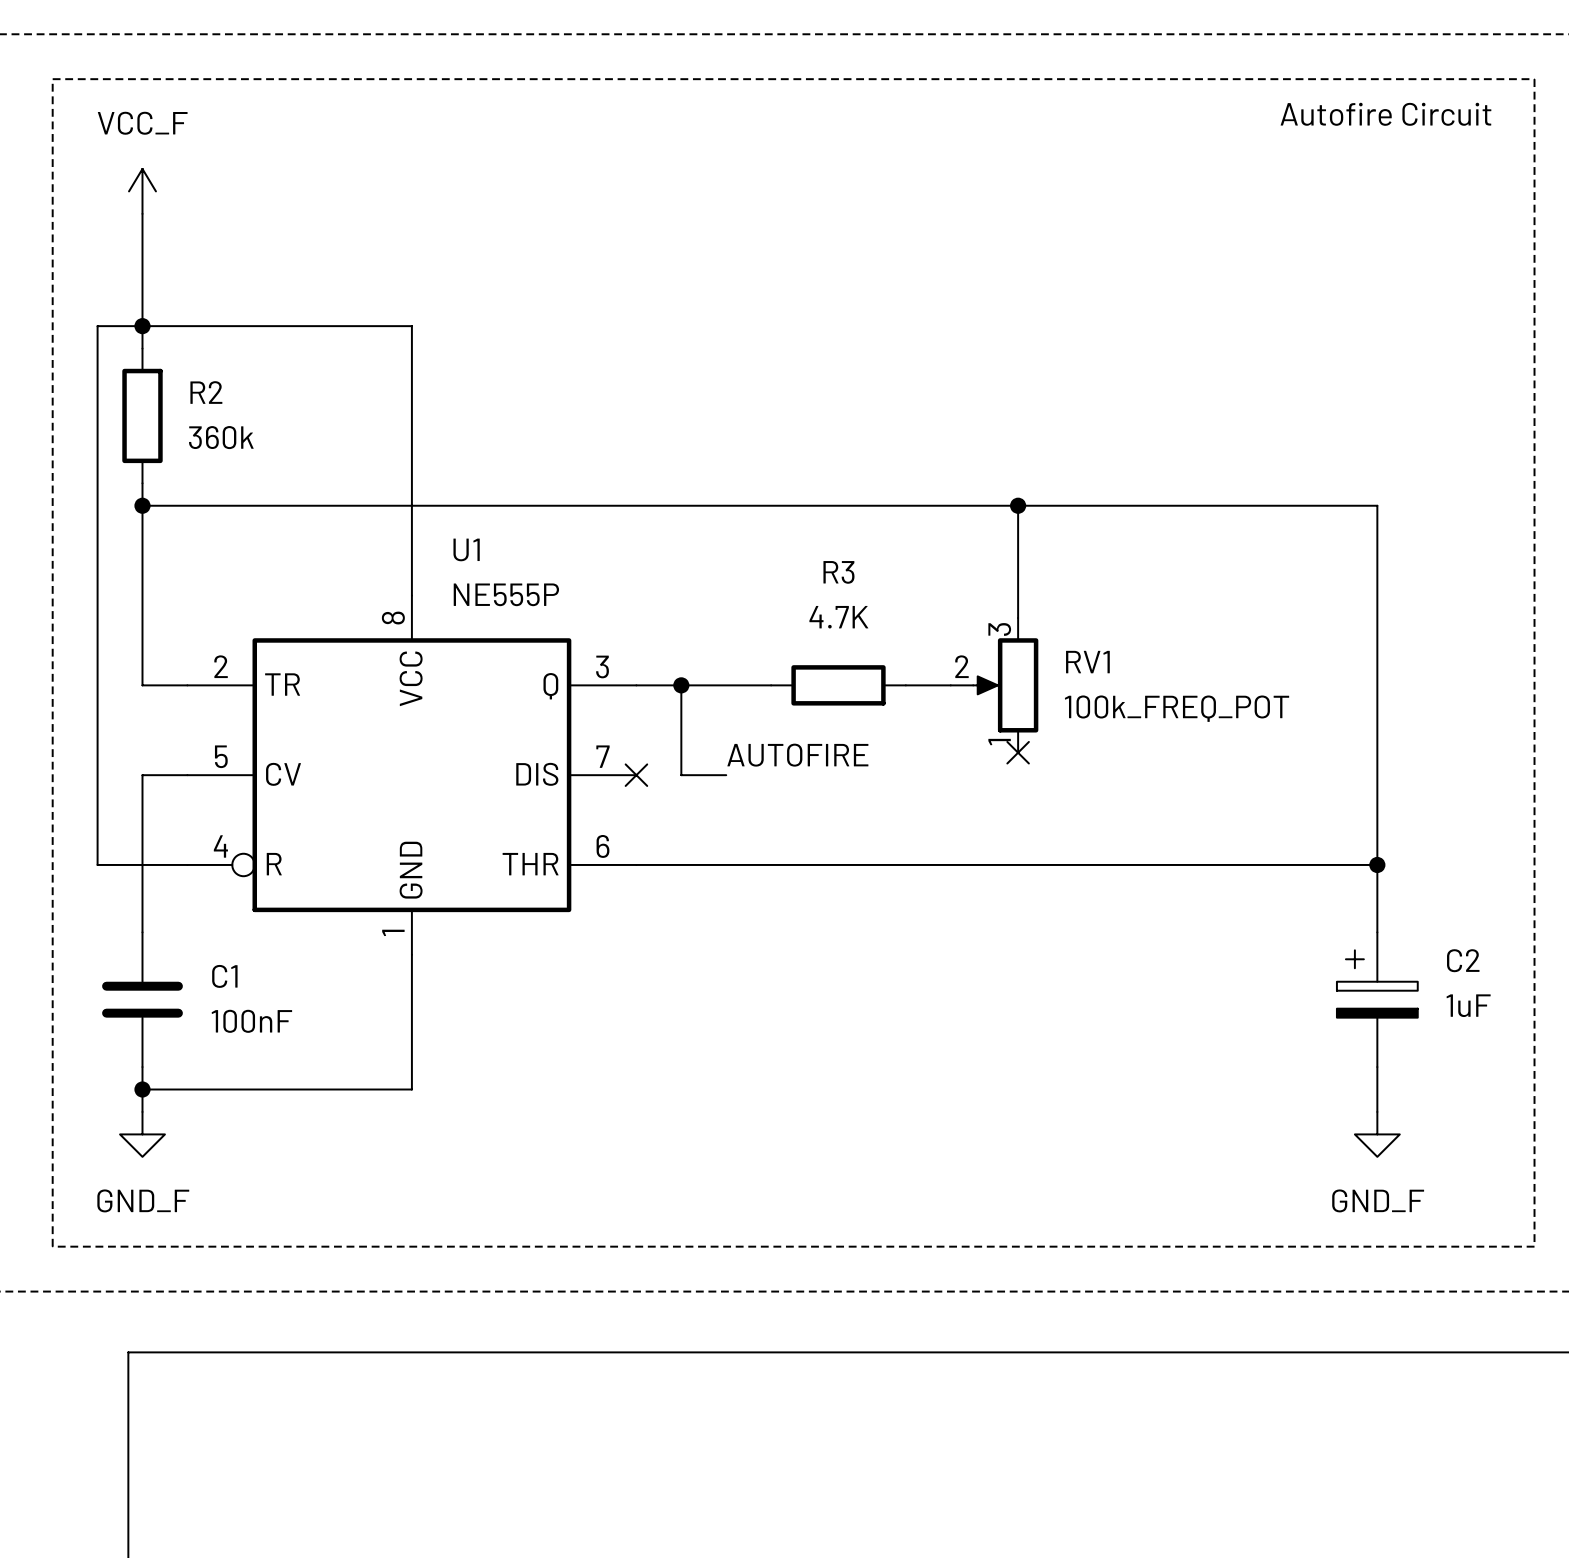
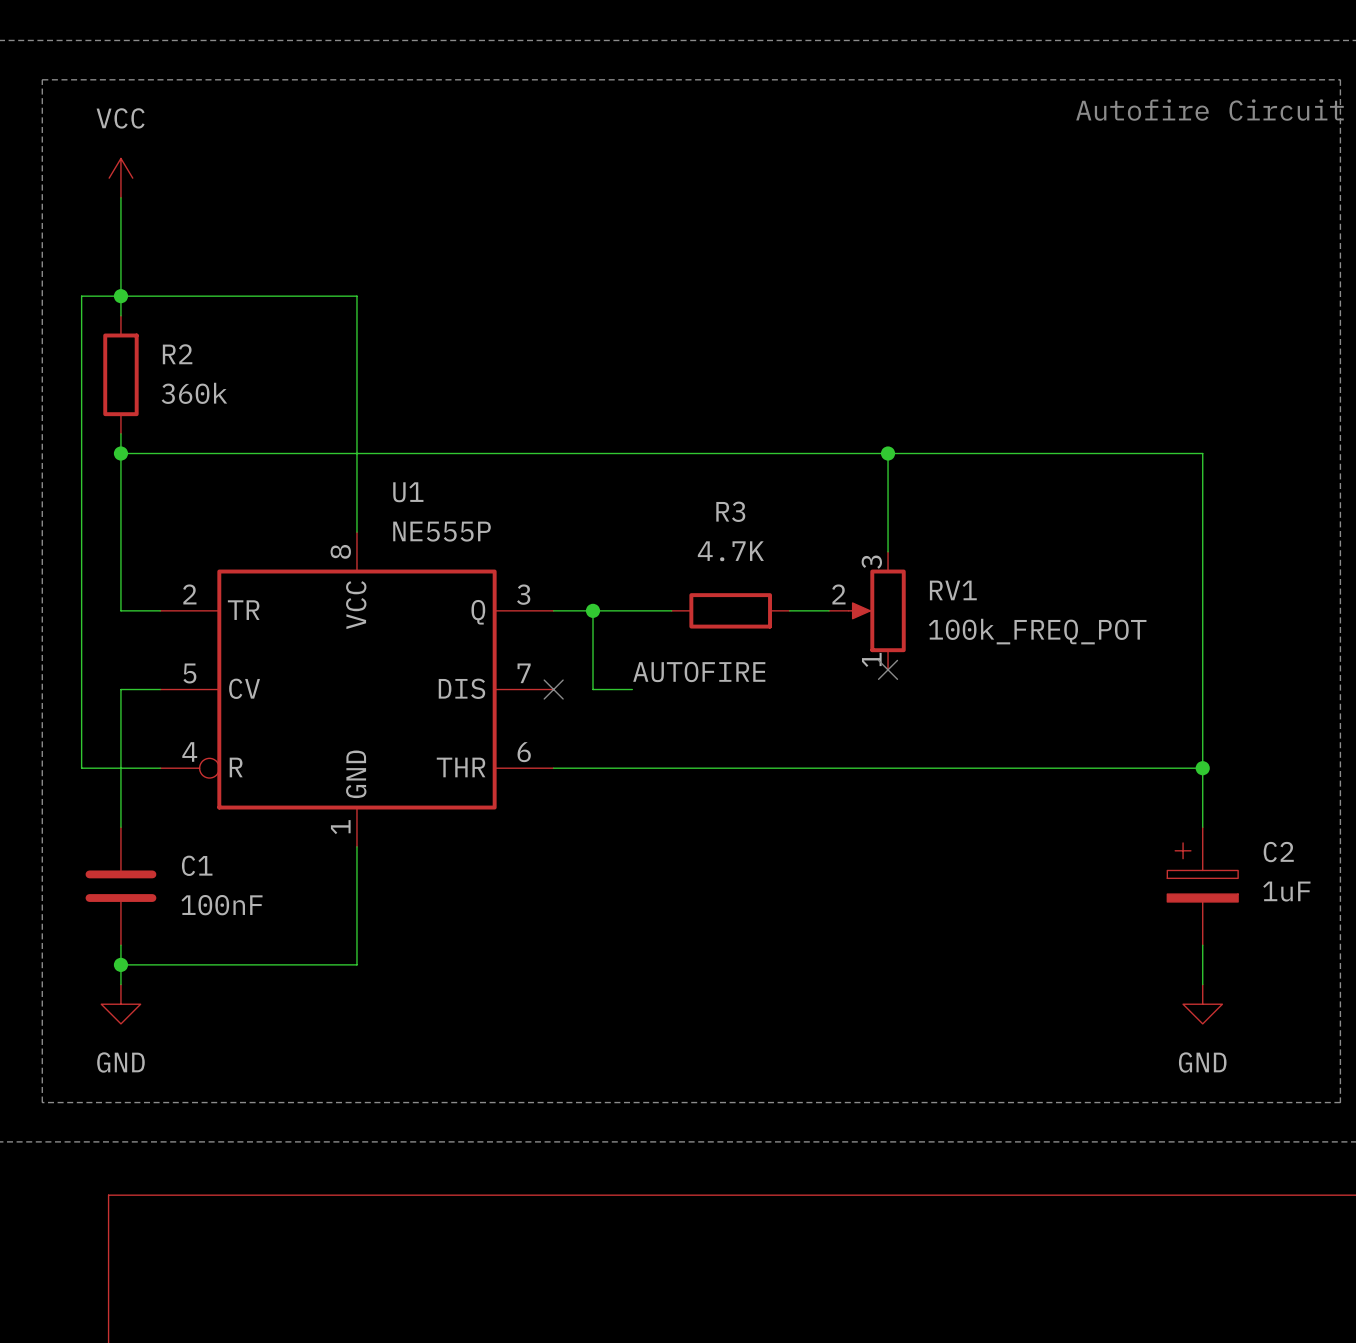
power symbol: VCC_F (142, 191) -> VCC (120, 178)
power symbol: GND_F (142, 1134) -> GND (120, 1004)
power symbol: GND_F (1377, 1134) -> GND (1202, 1004)

